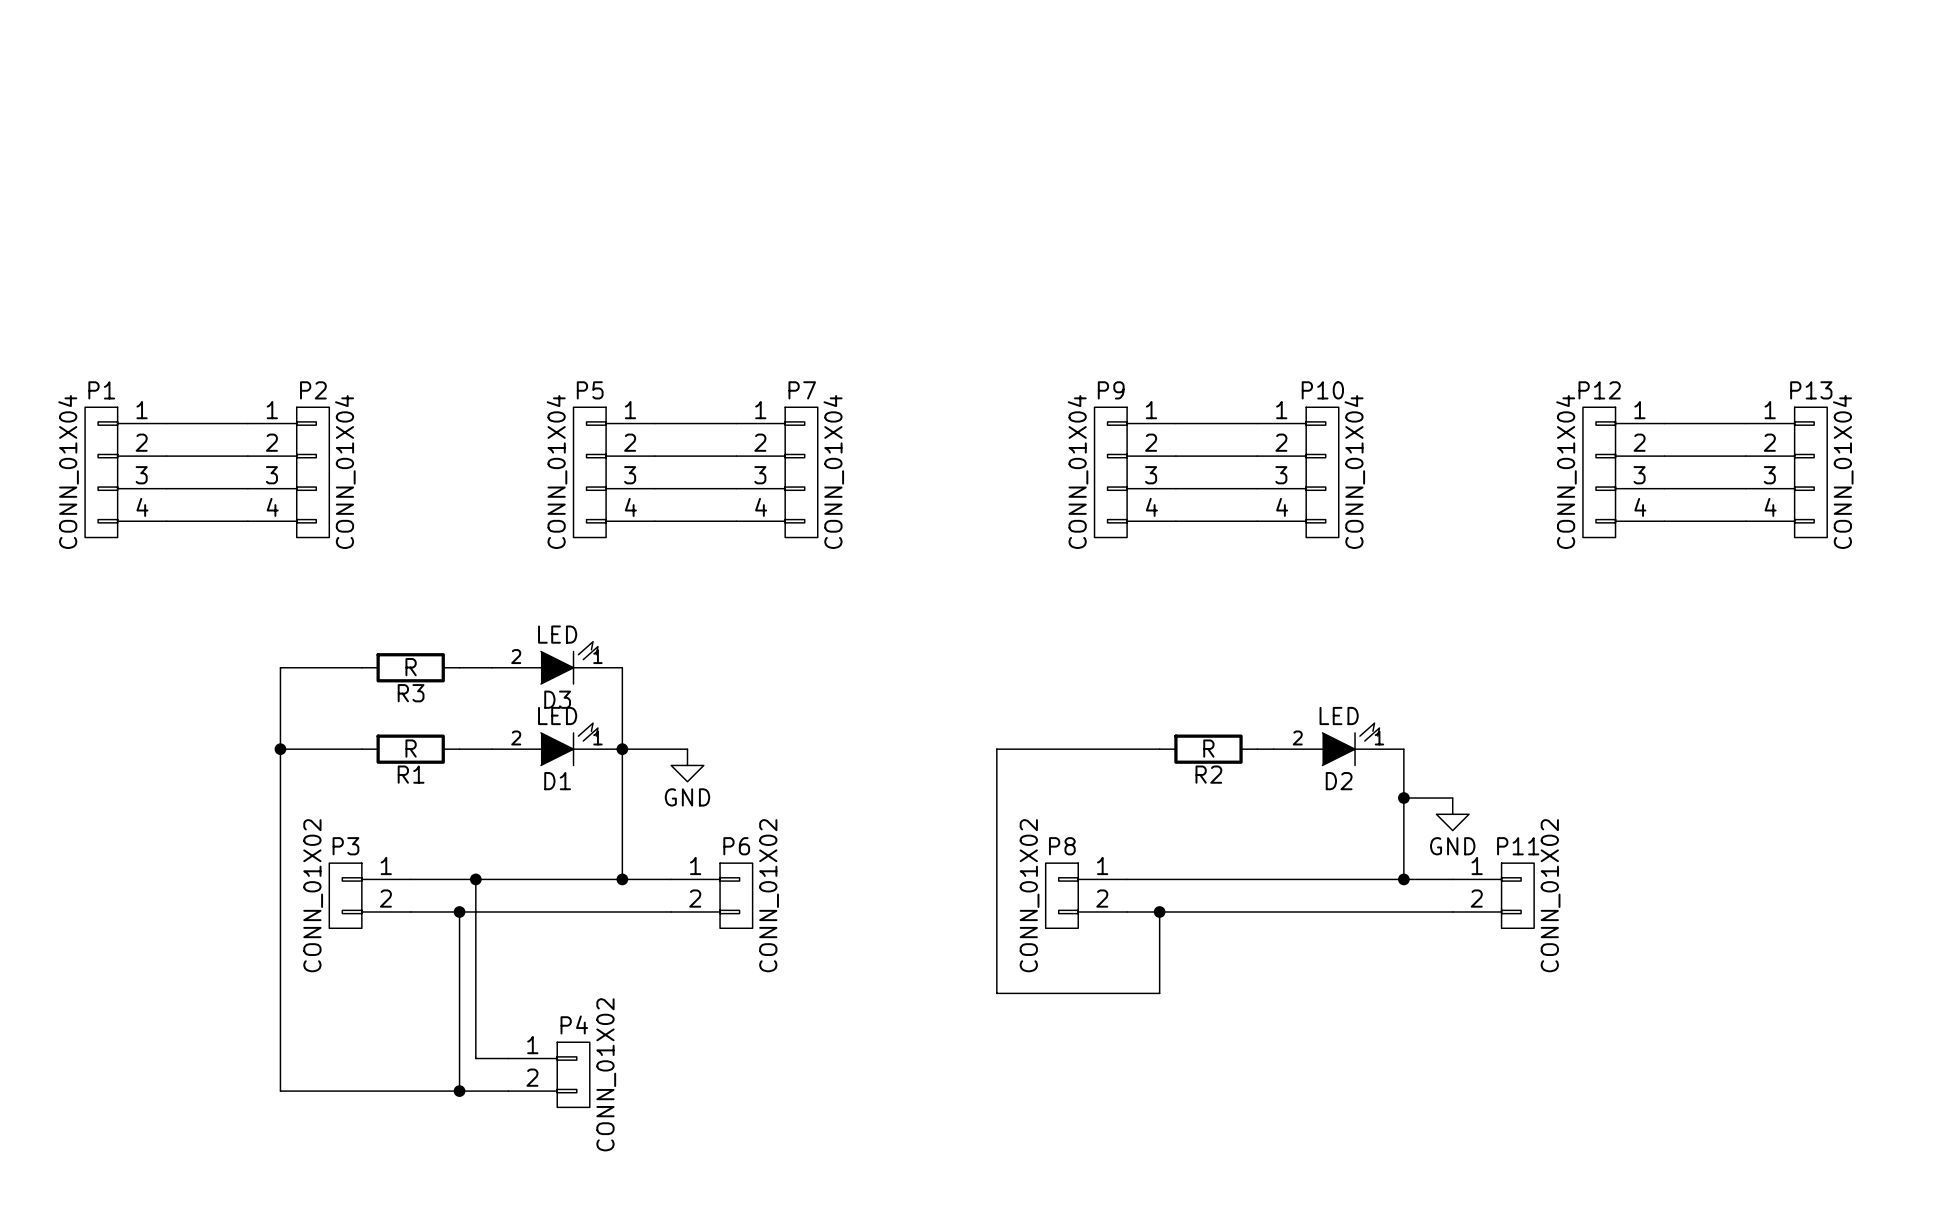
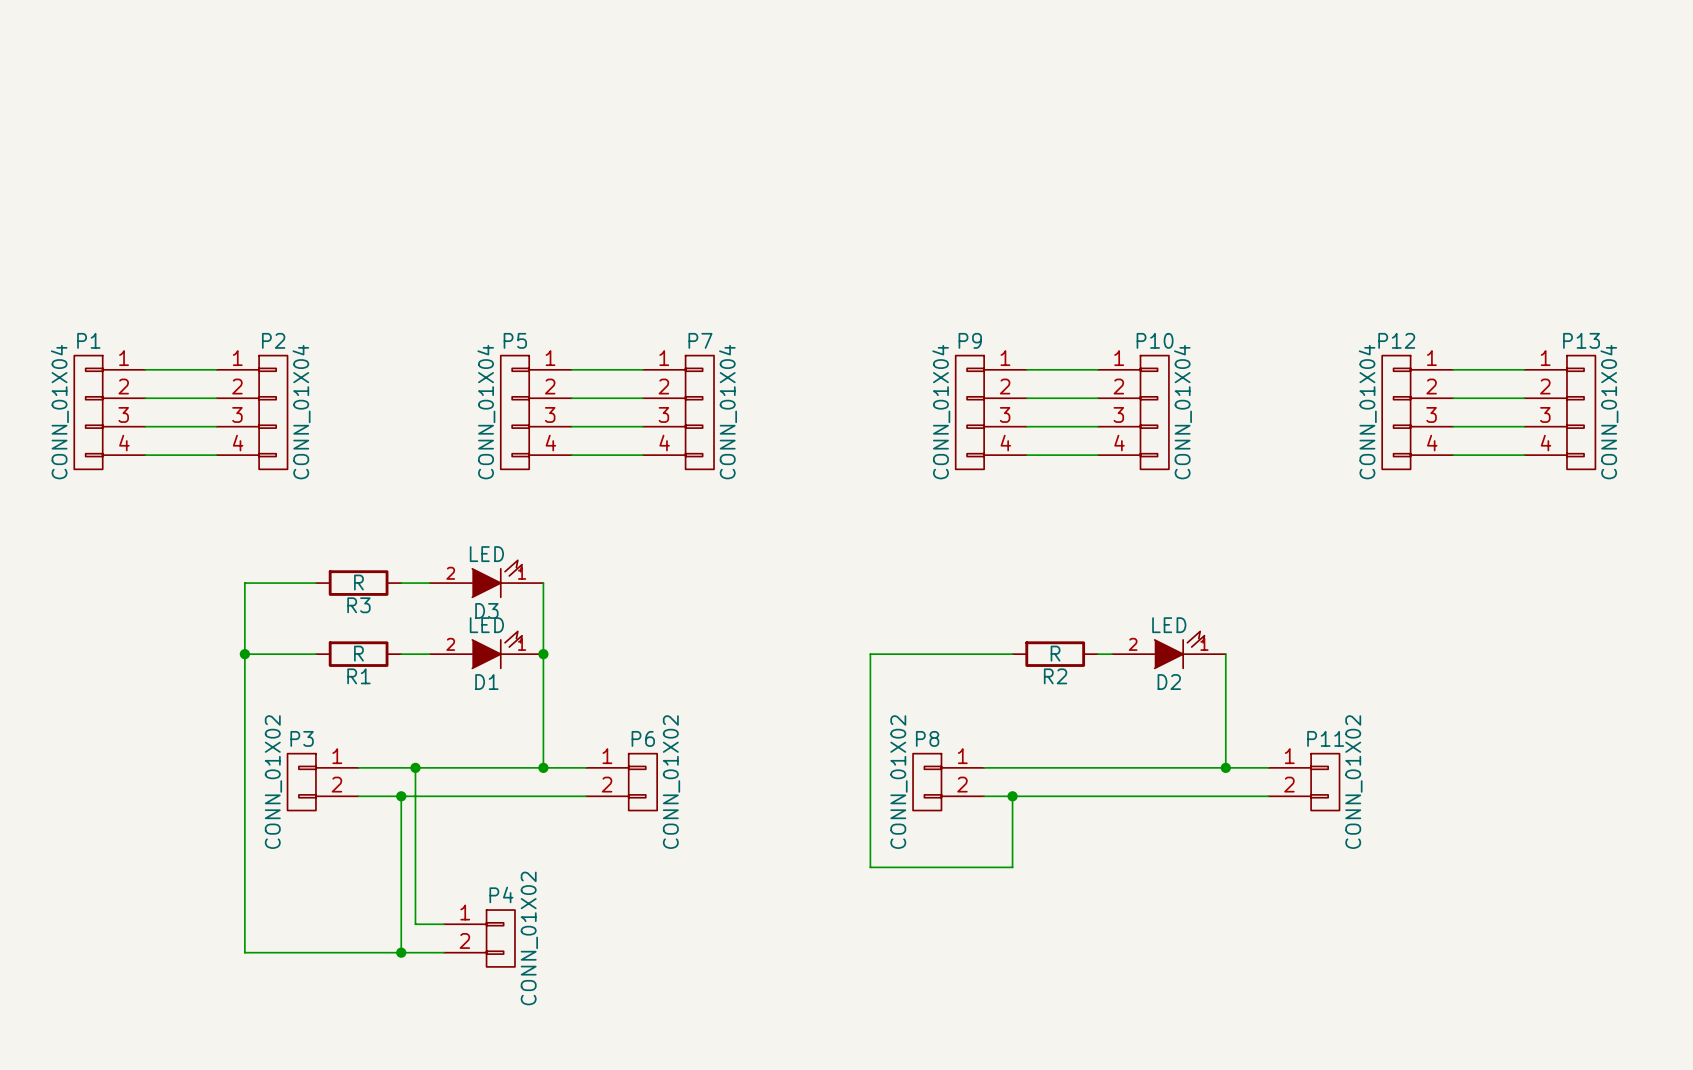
wire: (622, 749) (687, 749) -> none
power symbol: GND (687, 765) -> none
wire: (1403, 798) (1452, 798) -> none
junction: (1403, 798) -> none
power symbol: GND (1452, 814) -> none

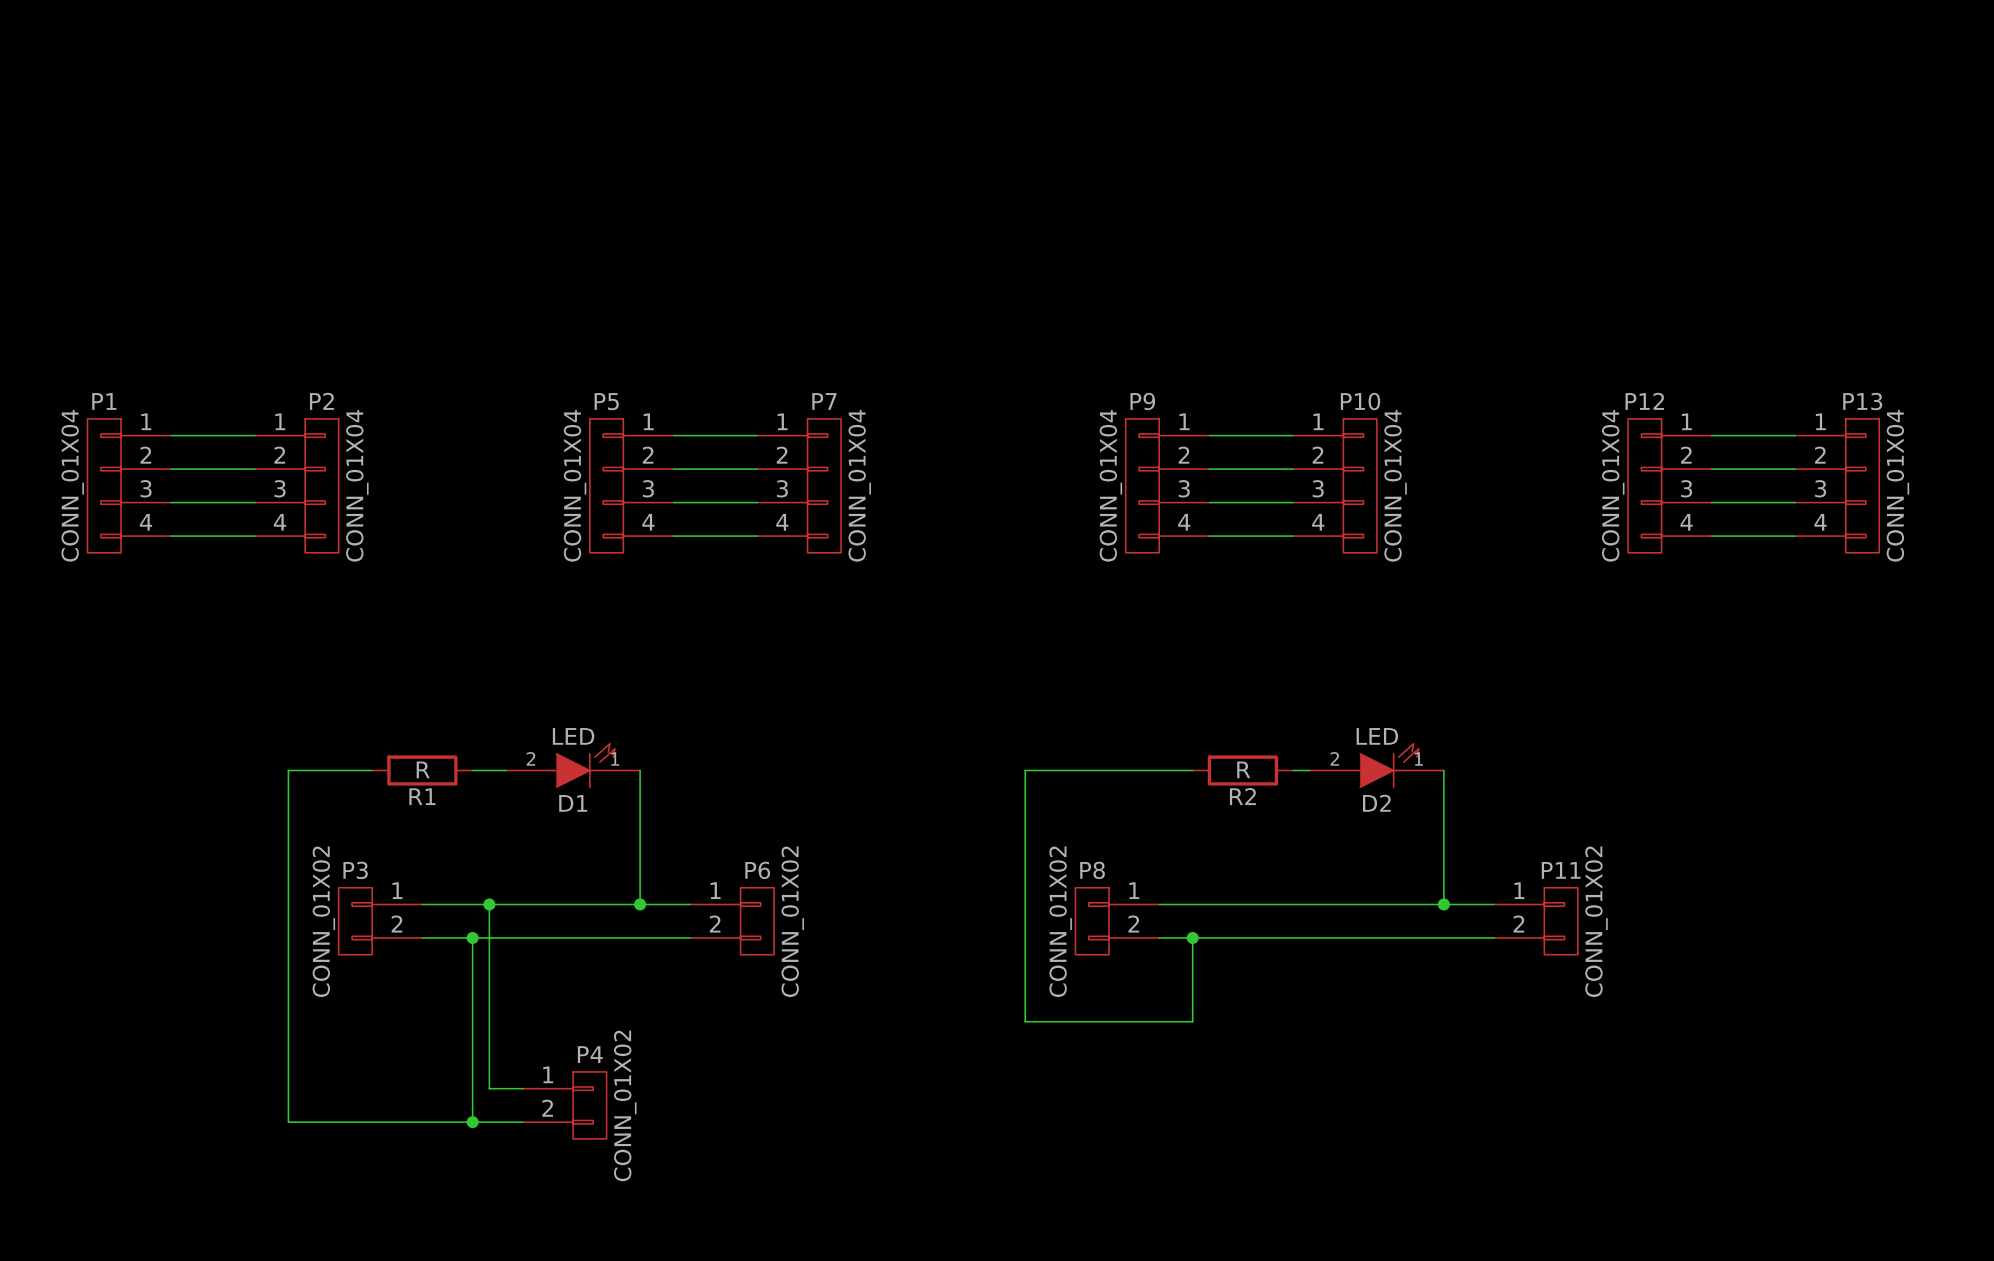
D3: LED (486, 578) -> none
wire: (315, 583) (244, 583) (244, 654) -> none
R3: R (358, 583) -> none
wire: (401, 583) (429, 583) -> none
wire: (543, 583) (543, 654) -> none
junction: (244, 654) -> none
junction: (543, 654) -> none

